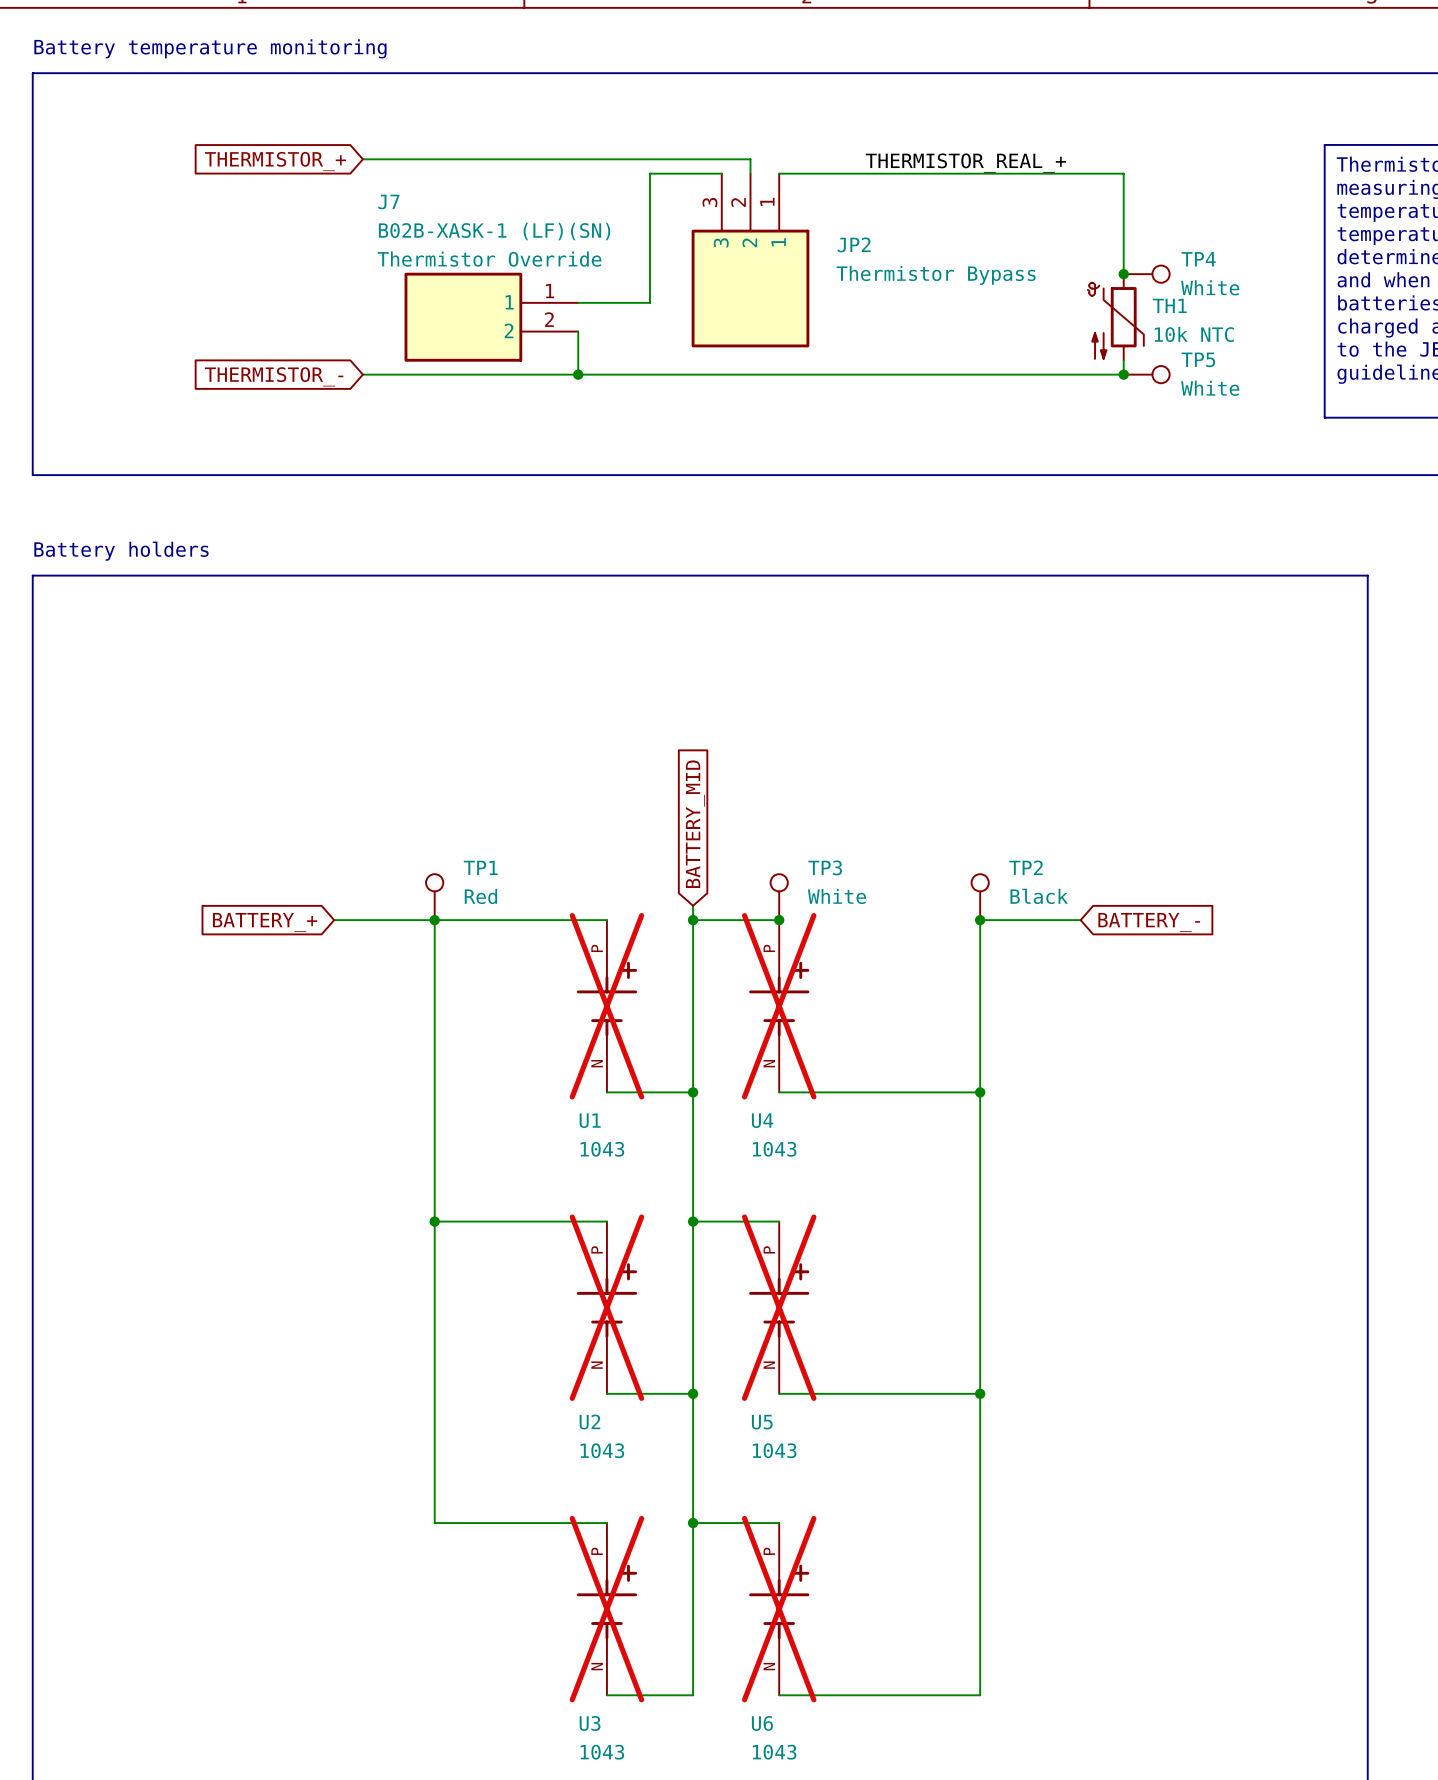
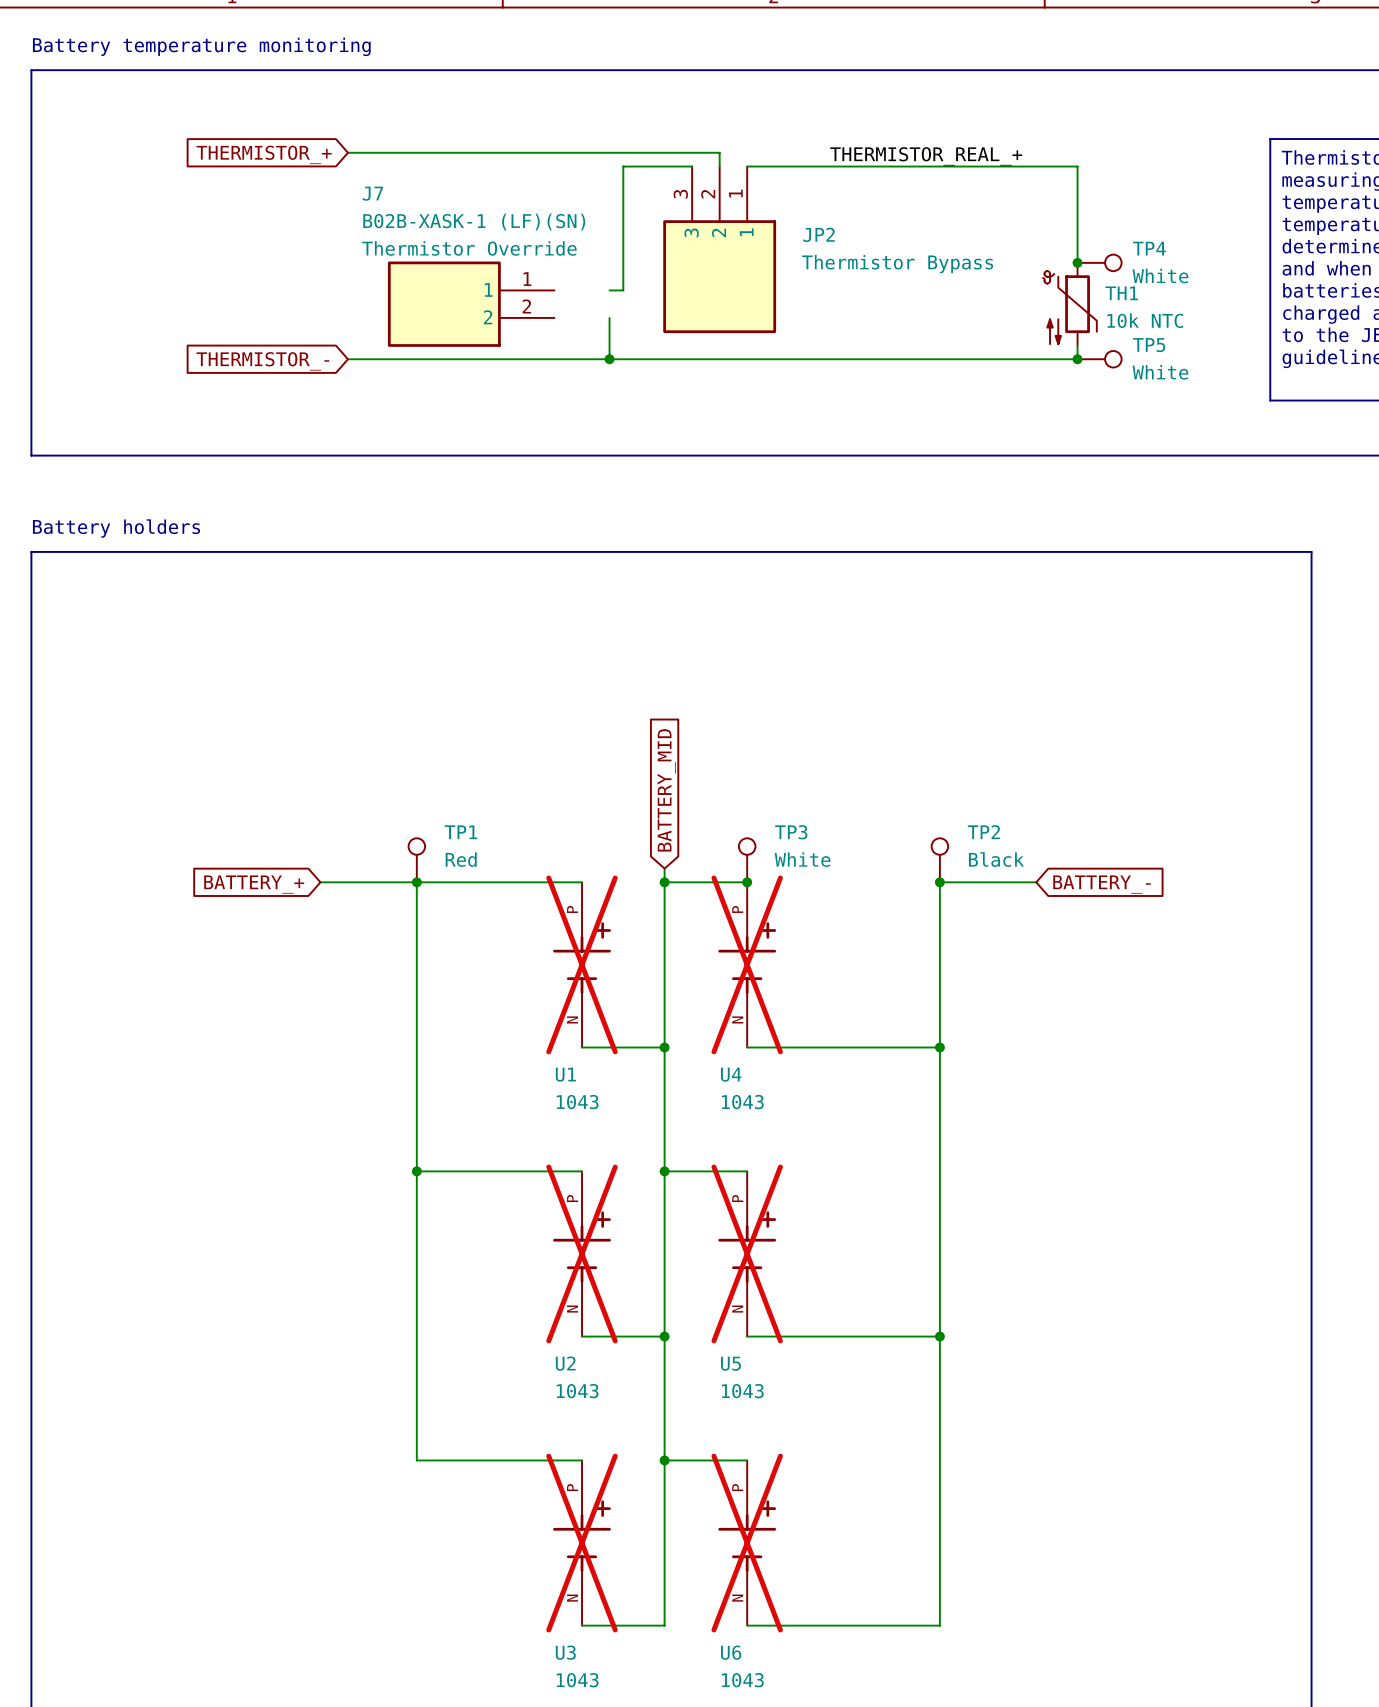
wire: (578, 302) (635, 302) -> none
wire: (578, 331) (578, 374) -> (609, 317) (609, 359)
junction position: (578, 374) -> (609, 359)

